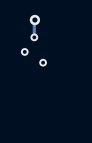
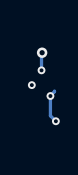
track: none -> (54, 91) (50, 95) (50, 115) (55, 121)
via: none -> (55, 121)

